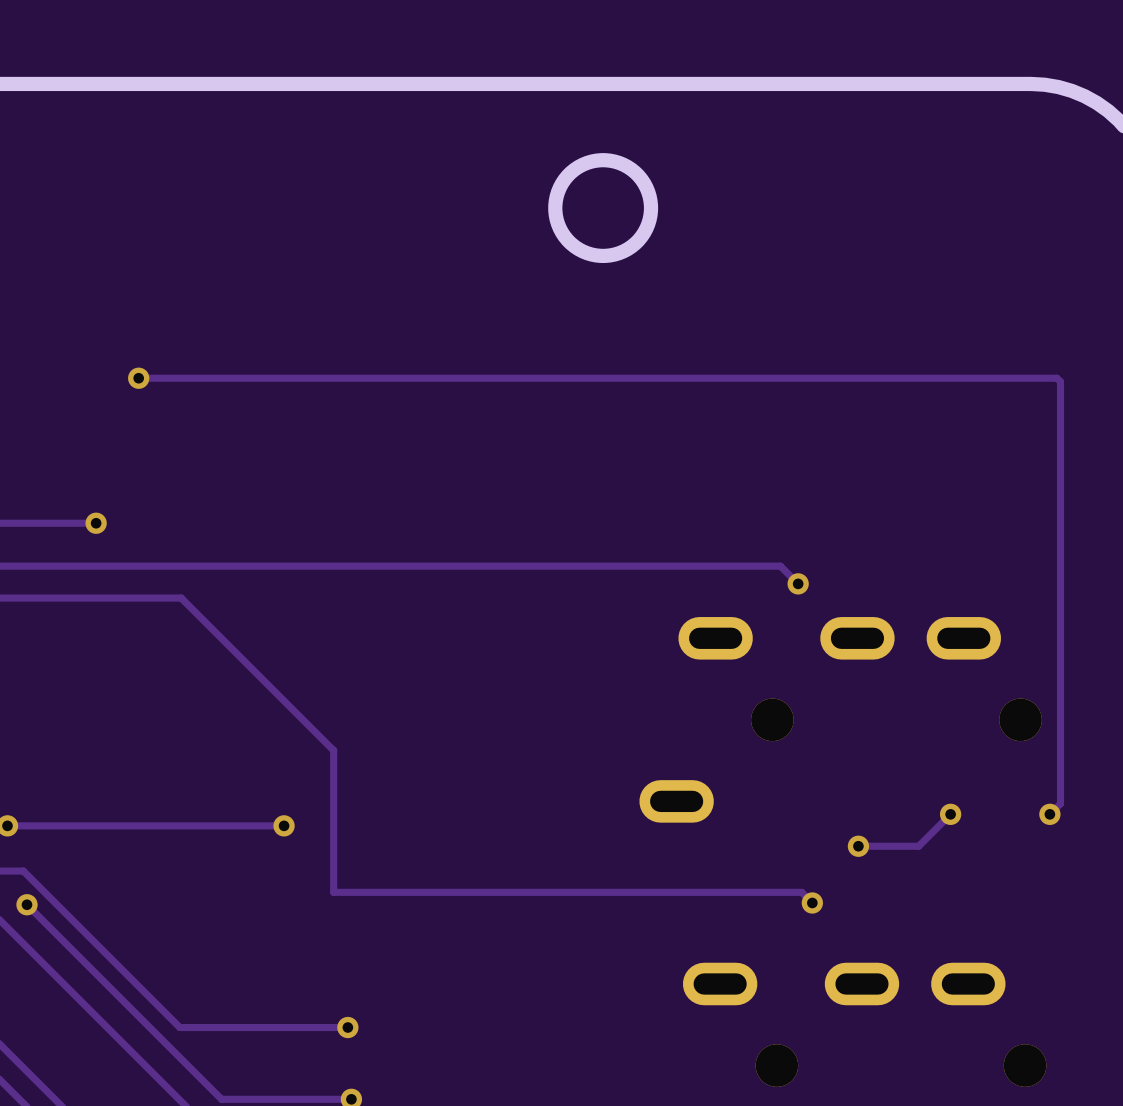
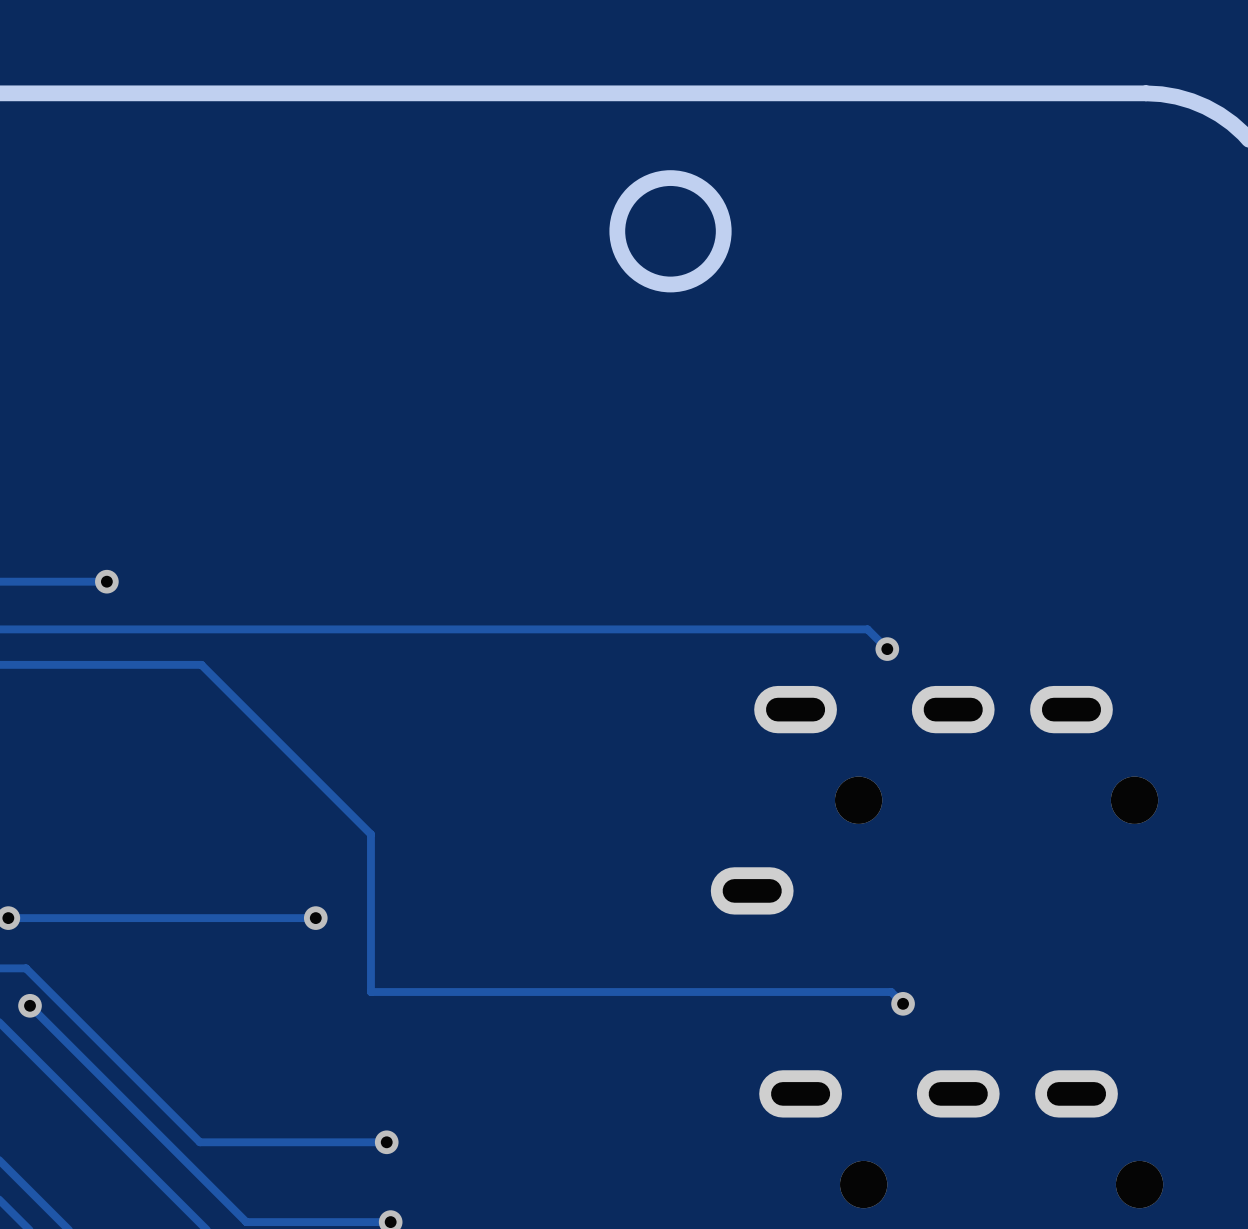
track: (138, 378) (1056, 378) (1060, 381) (1060, 803) (1049, 814) -> none
via: (138, 378) -> none
track: (947, 810) (950, 814) (918, 846) (858, 846) -> none
via: (950, 814) -> none
via: (1049, 814) -> none
via: (858, 846) -> none

